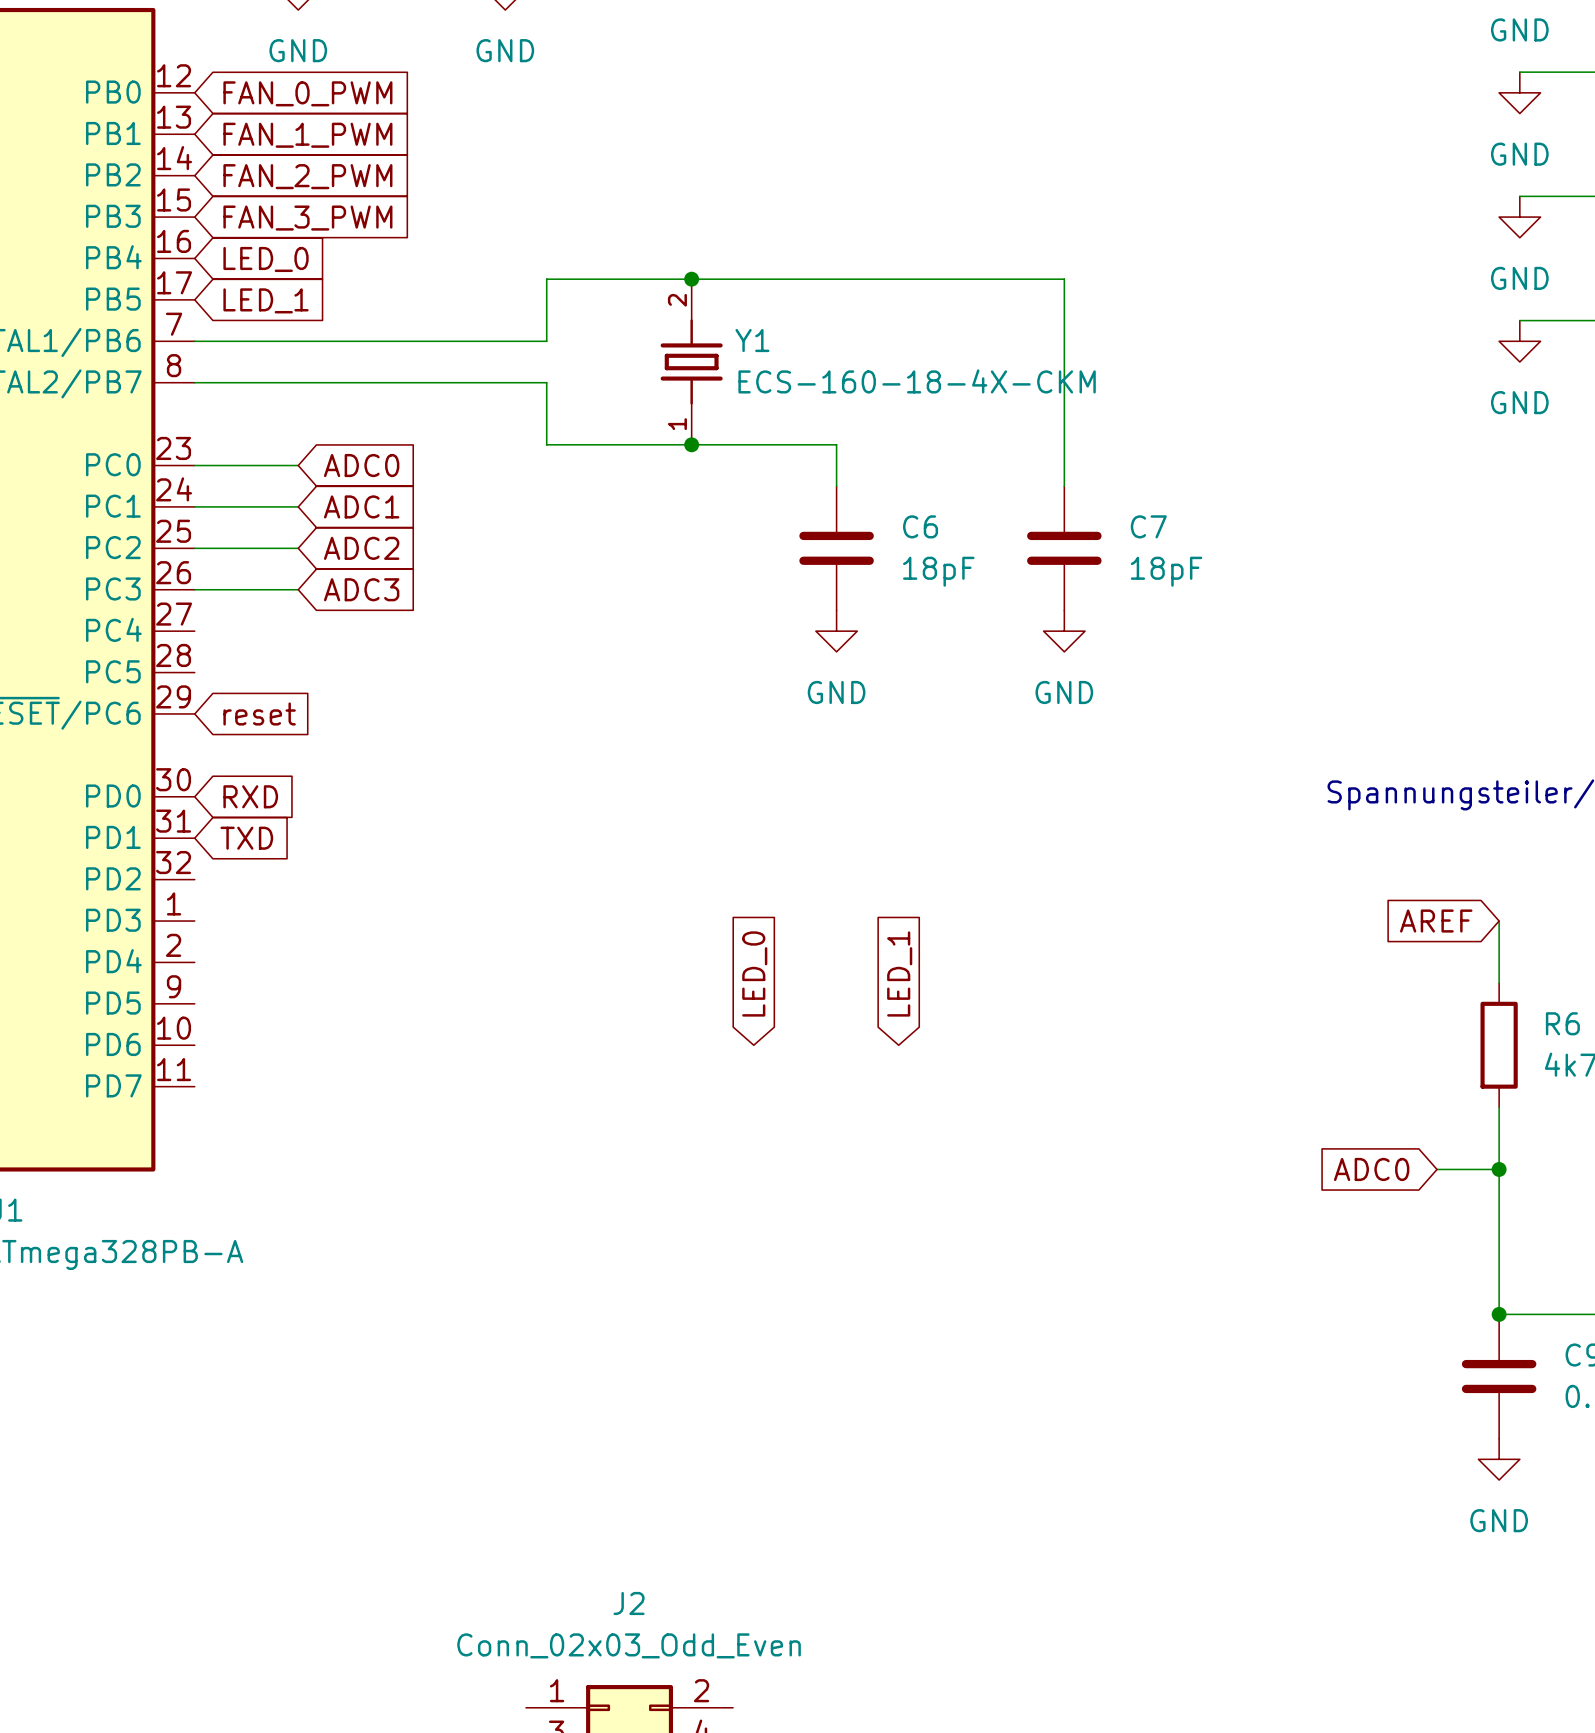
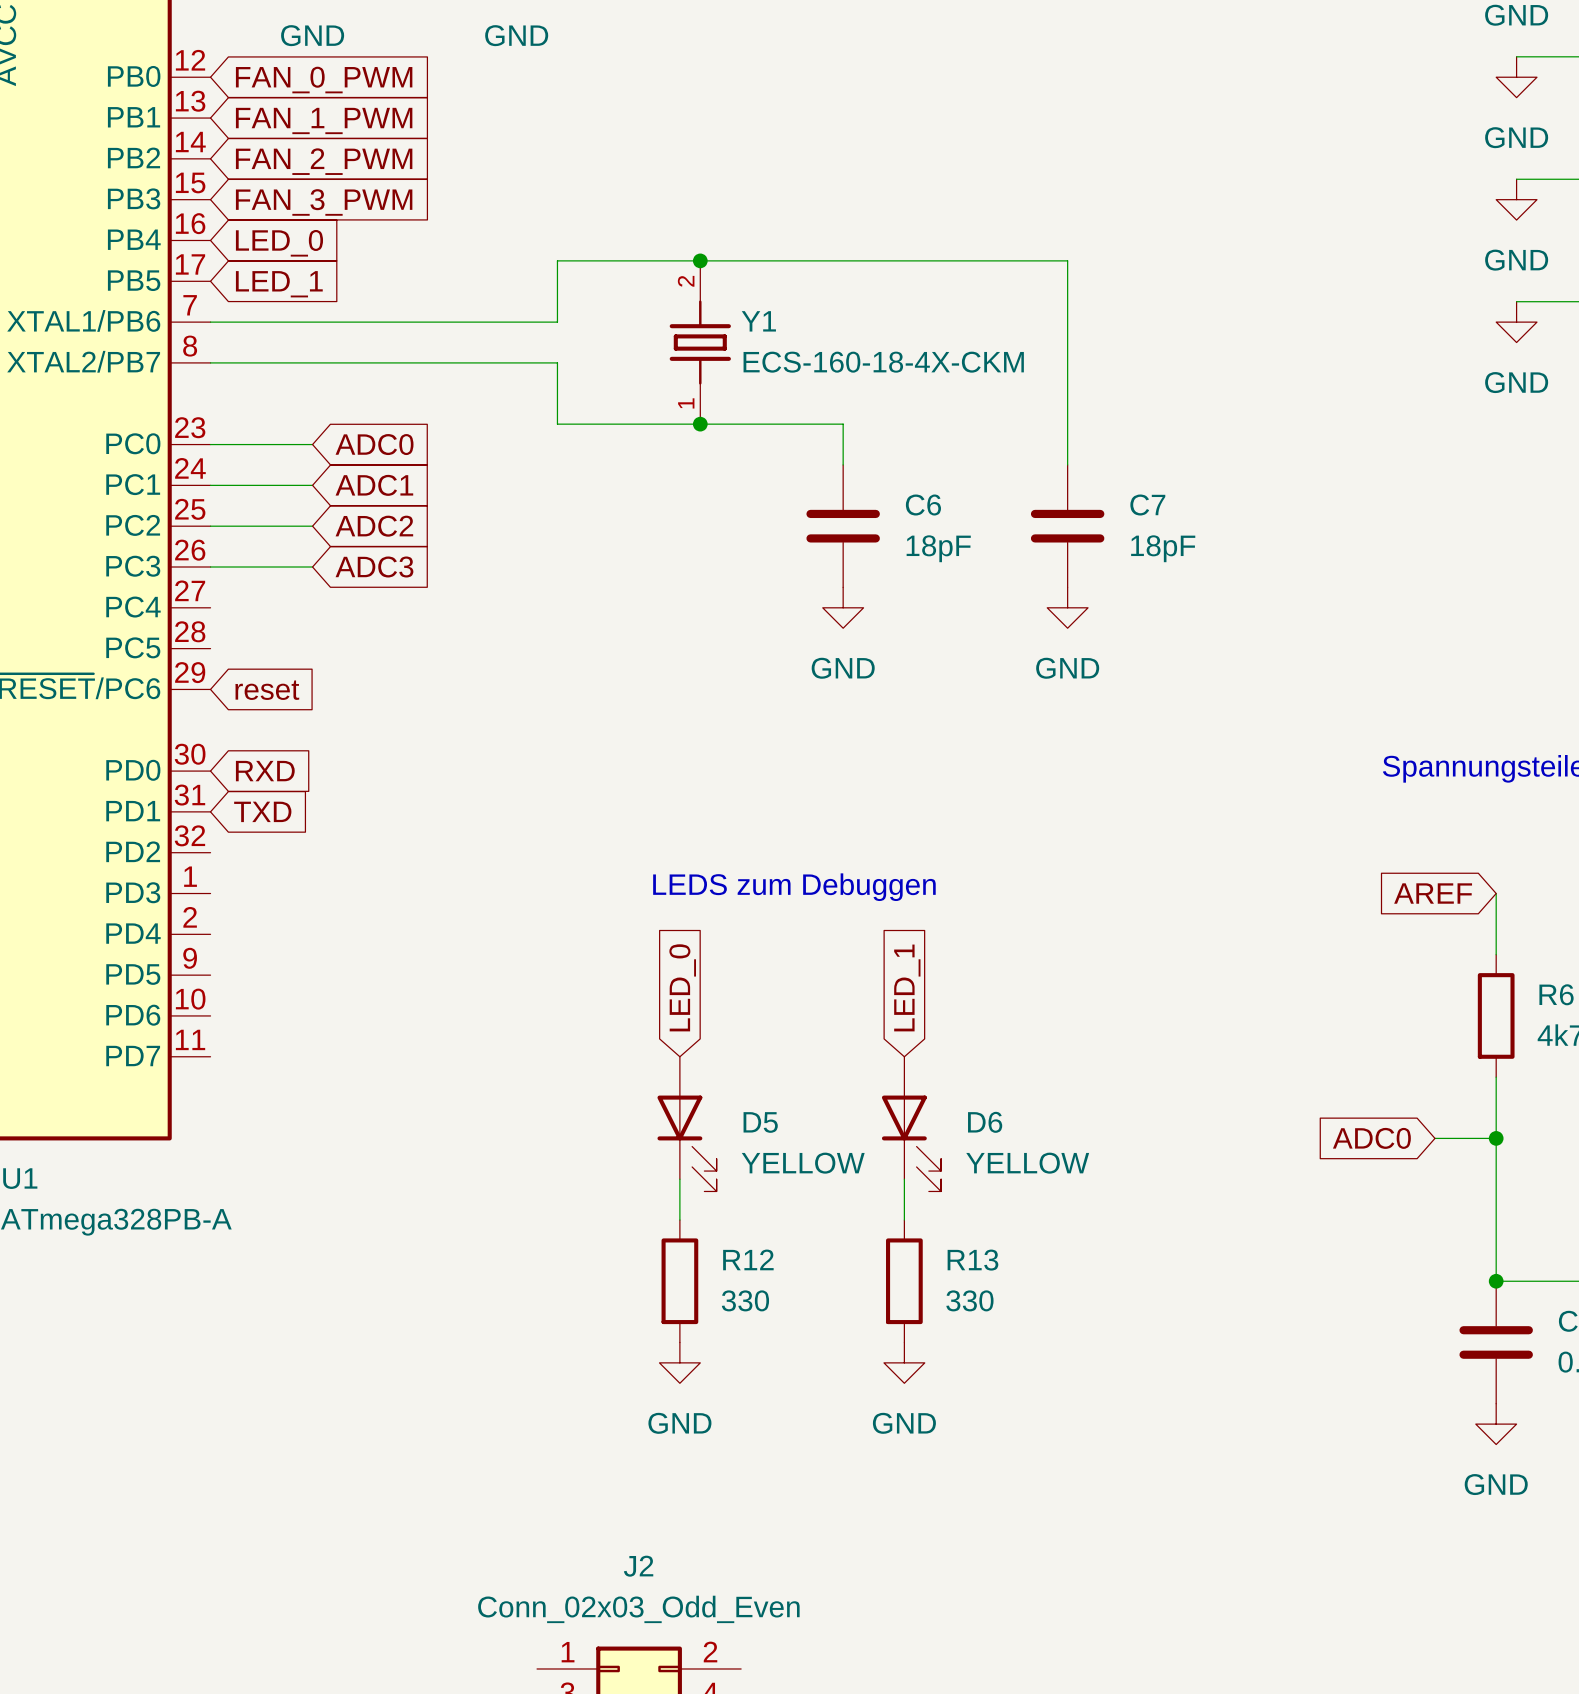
text: none -> LEDS zum Debuggen (794, 887)
global label position: LED_0 (754, 973) -> LED_0 (682, 987)
global label position: LED_1 (899, 973) -> LED_1 (907, 987)
D5: none -> YELLOW (687, 1124)
D6: none -> YELLOW (911, 1124)
wire: none -> (679, 1179) (679, 1220)
wire: none -> (904, 1179) (904, 1220)
R12: none -> 330 (679, 1281)
R13: none -> 330 (904, 1281)
power symbol: none -> GND (679, 1362)
power symbol: none -> GND (904, 1362)

